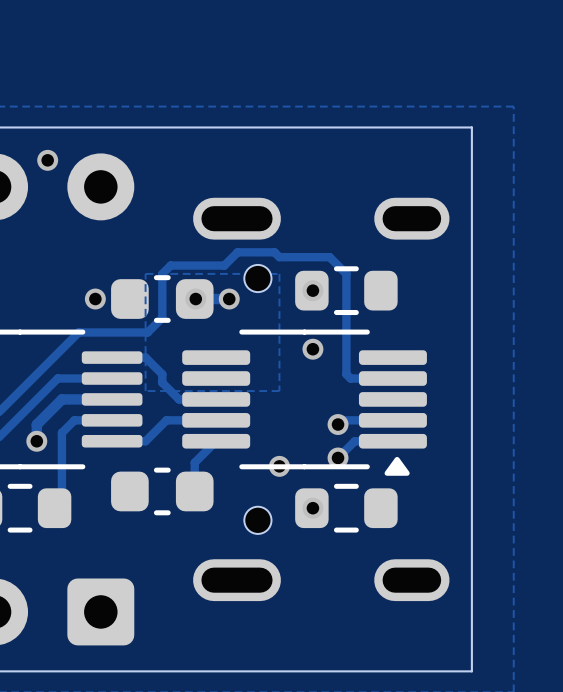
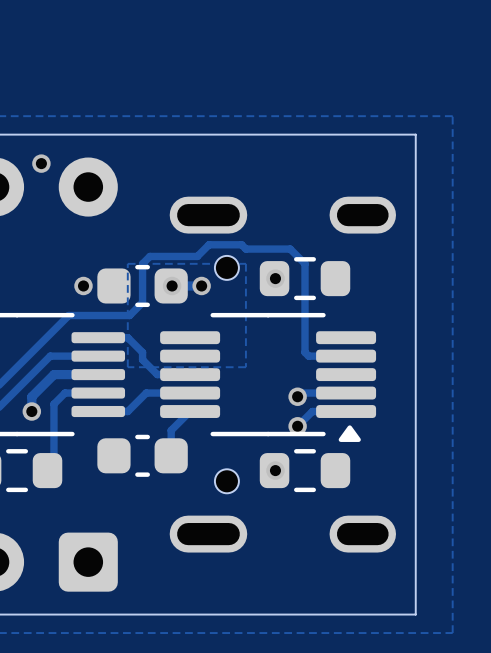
via: (312, 349) -> none
via: (279, 466) -> none

